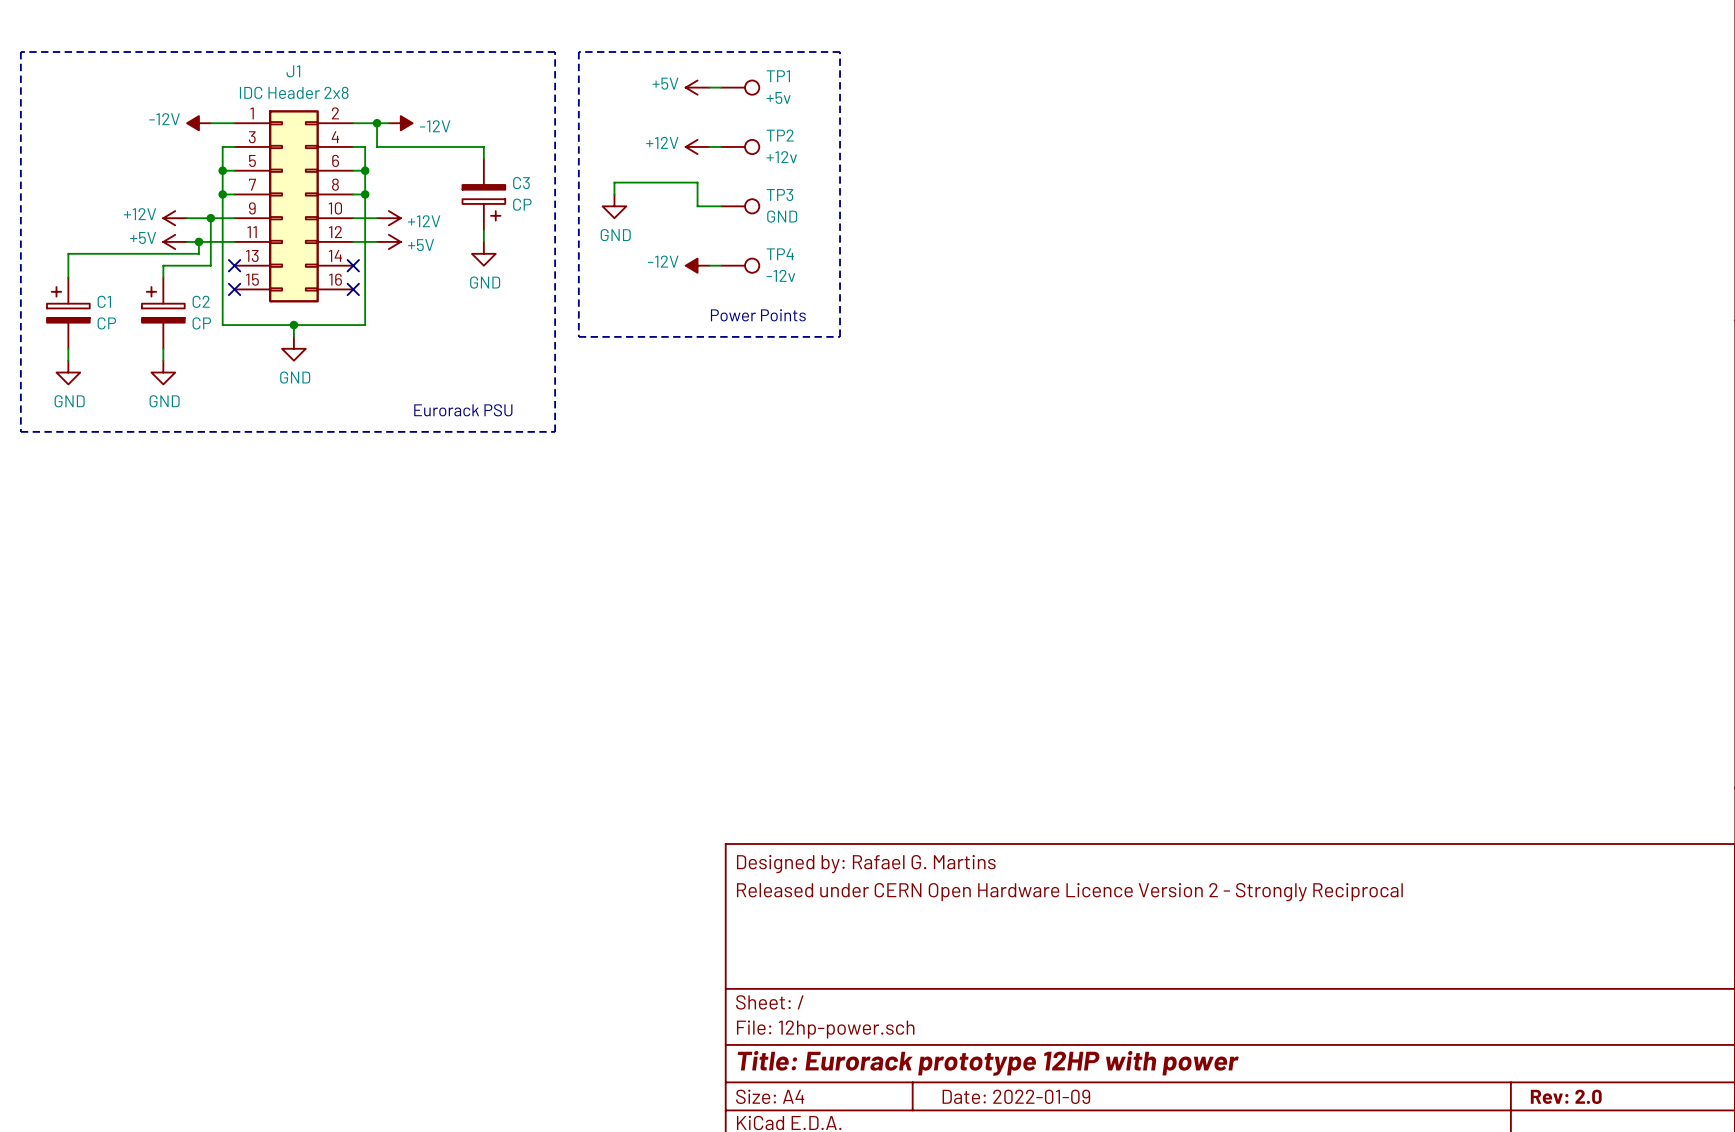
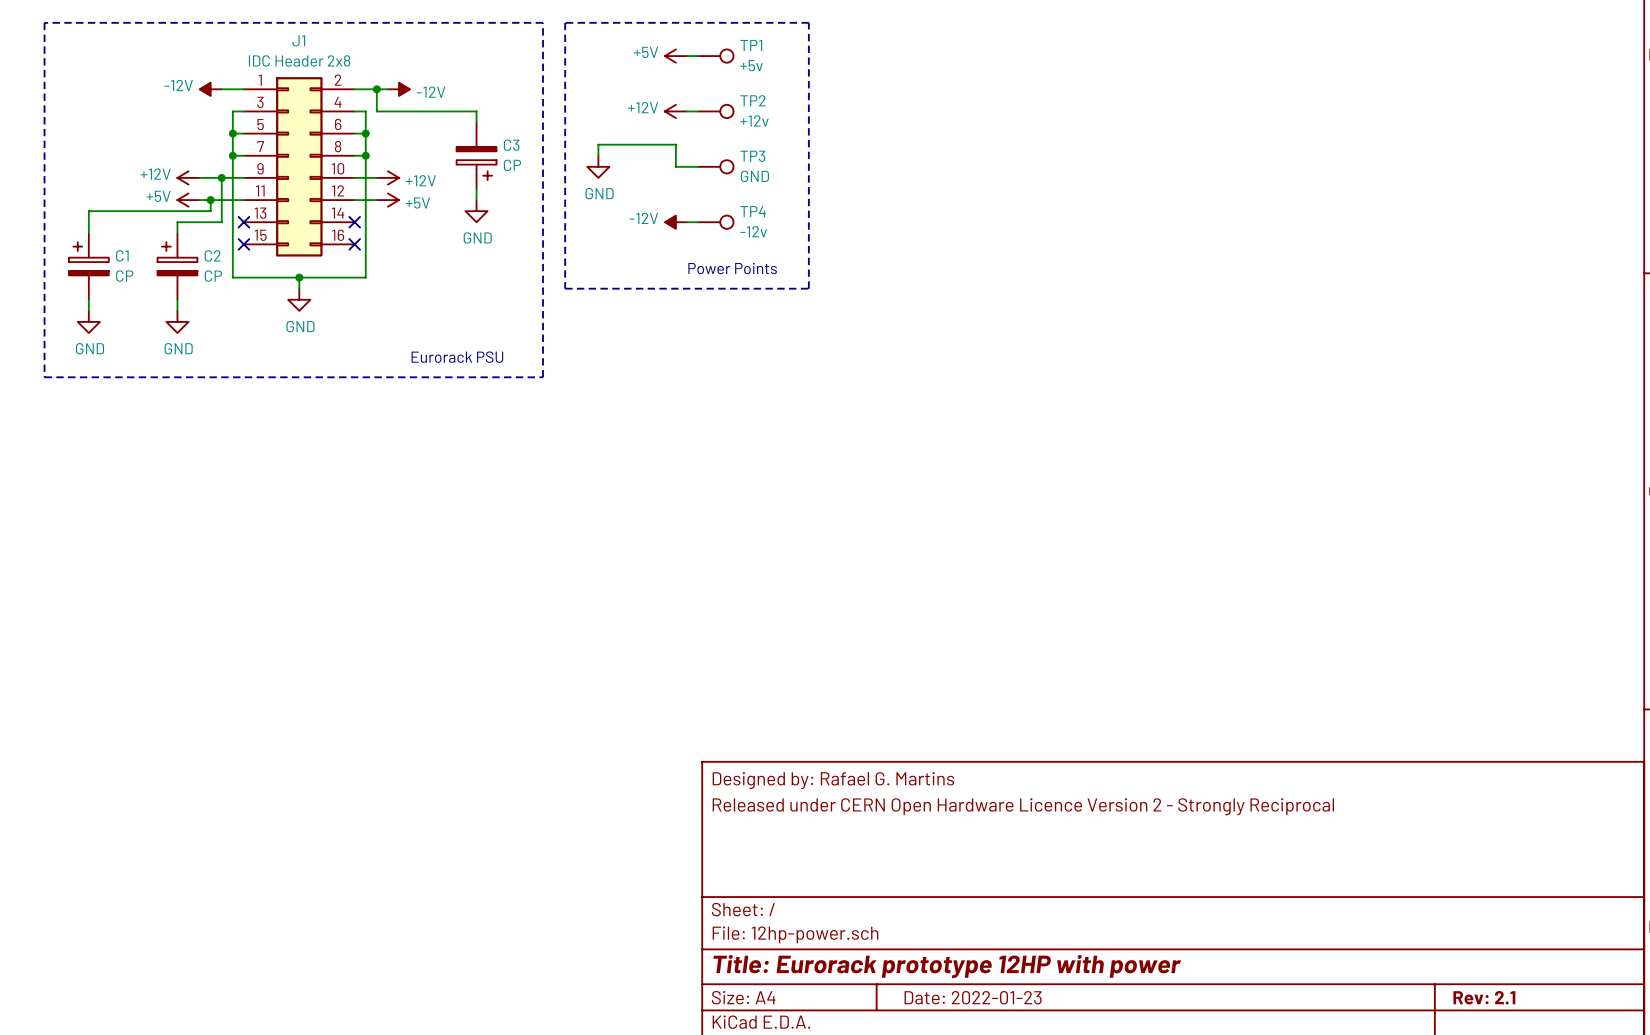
title block: Date: 2022-01-09 (1016, 1096) -> Date: 2022-01-23 (973, 997)
title block: Rev: 2.0 (1566, 1096) -> Rev: 2.1 (1484, 997)

